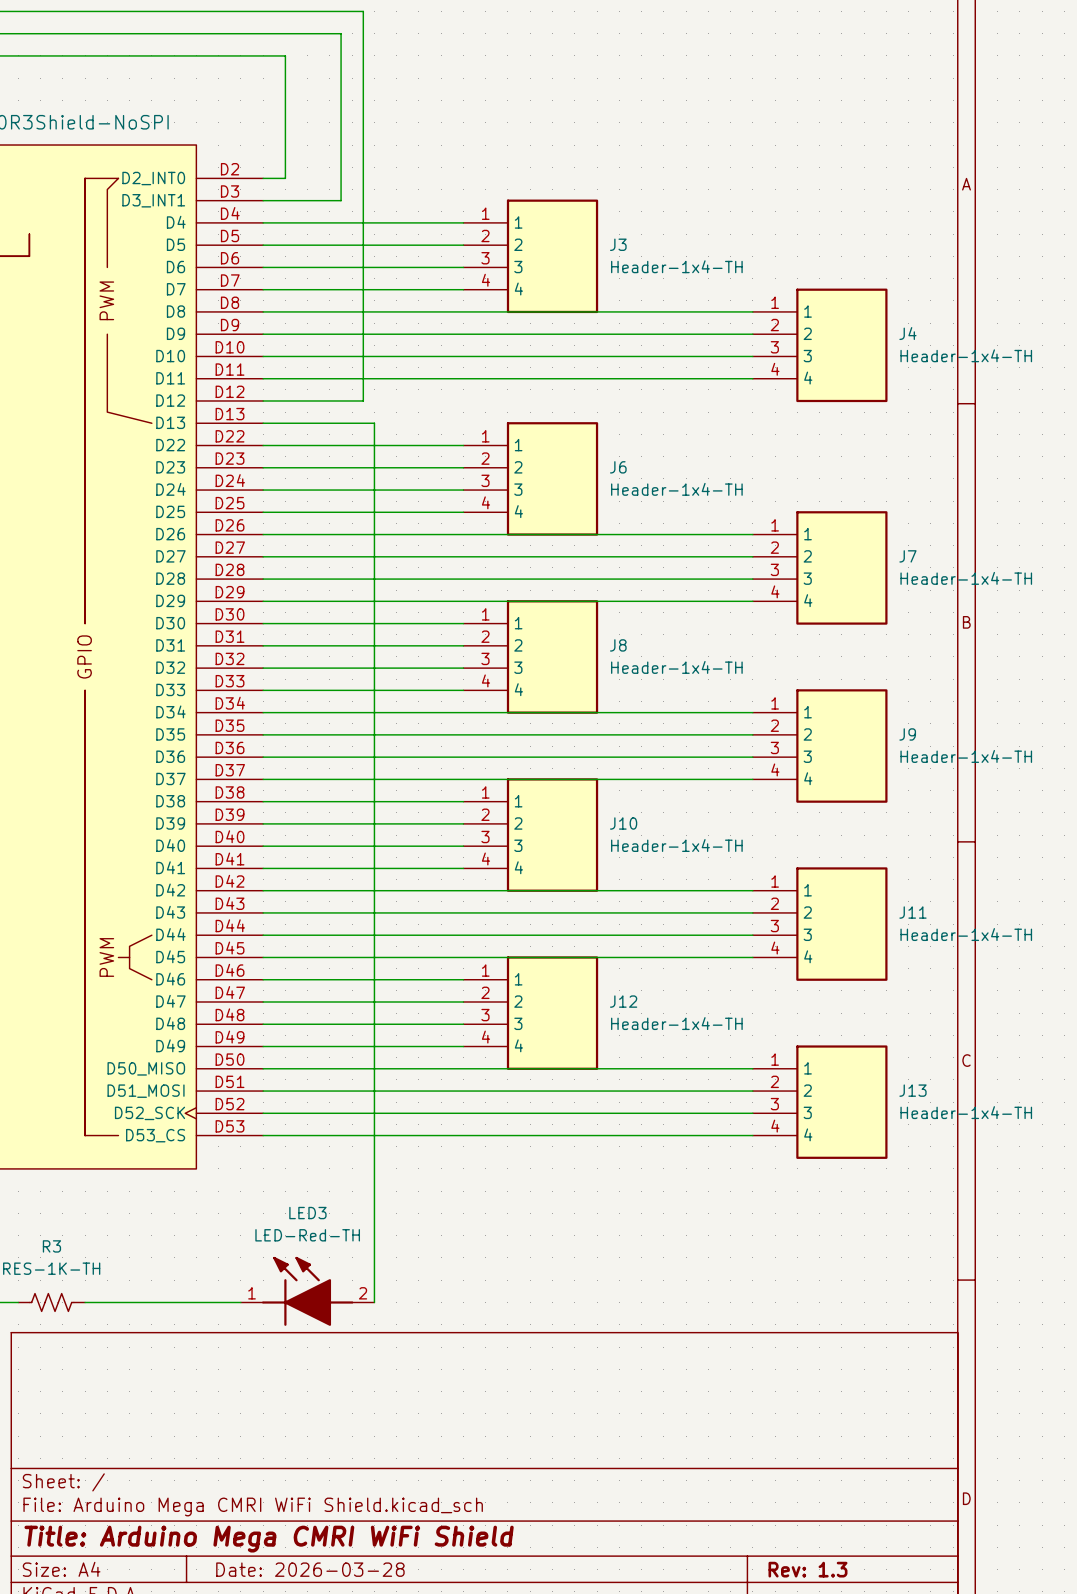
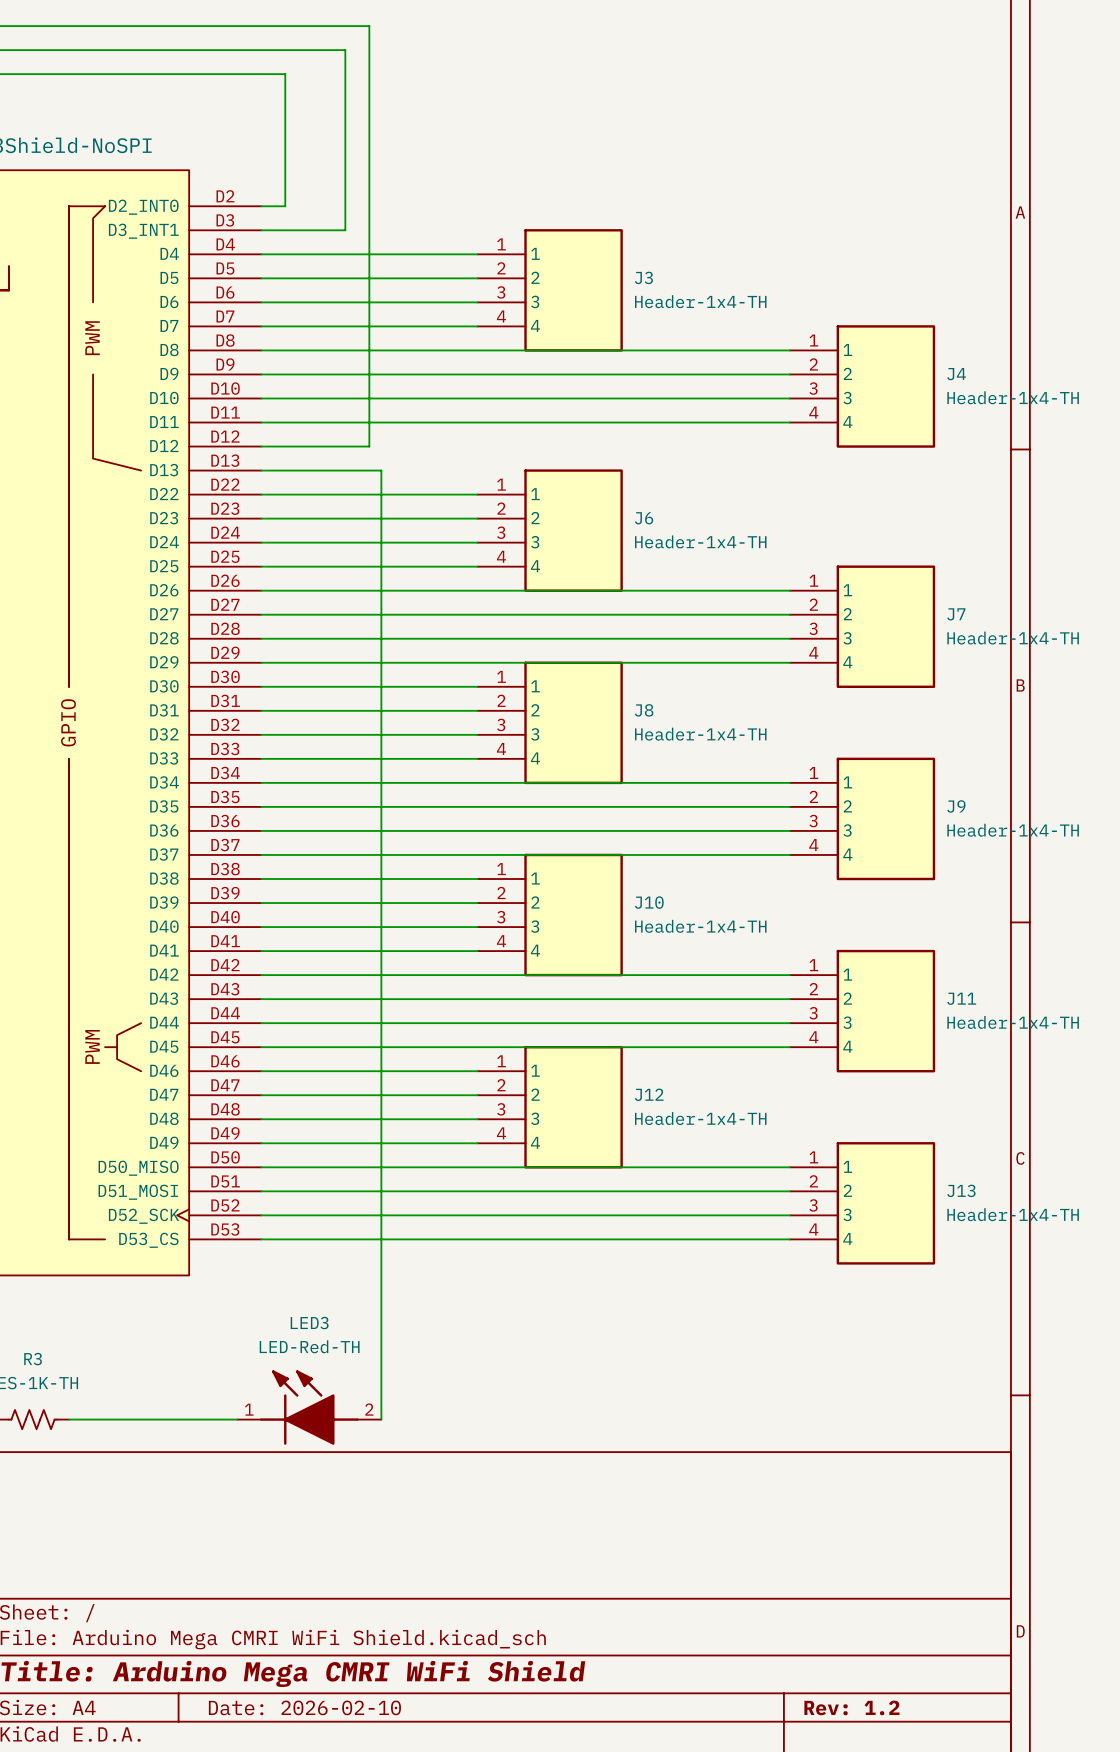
title block: Date: 2026-03-28 (310, 1569) -> Date: 2026-02-10 (304, 1707)
title block: Rev: 1.3 (807, 1569) -> Rev: 1.2 (851, 1707)

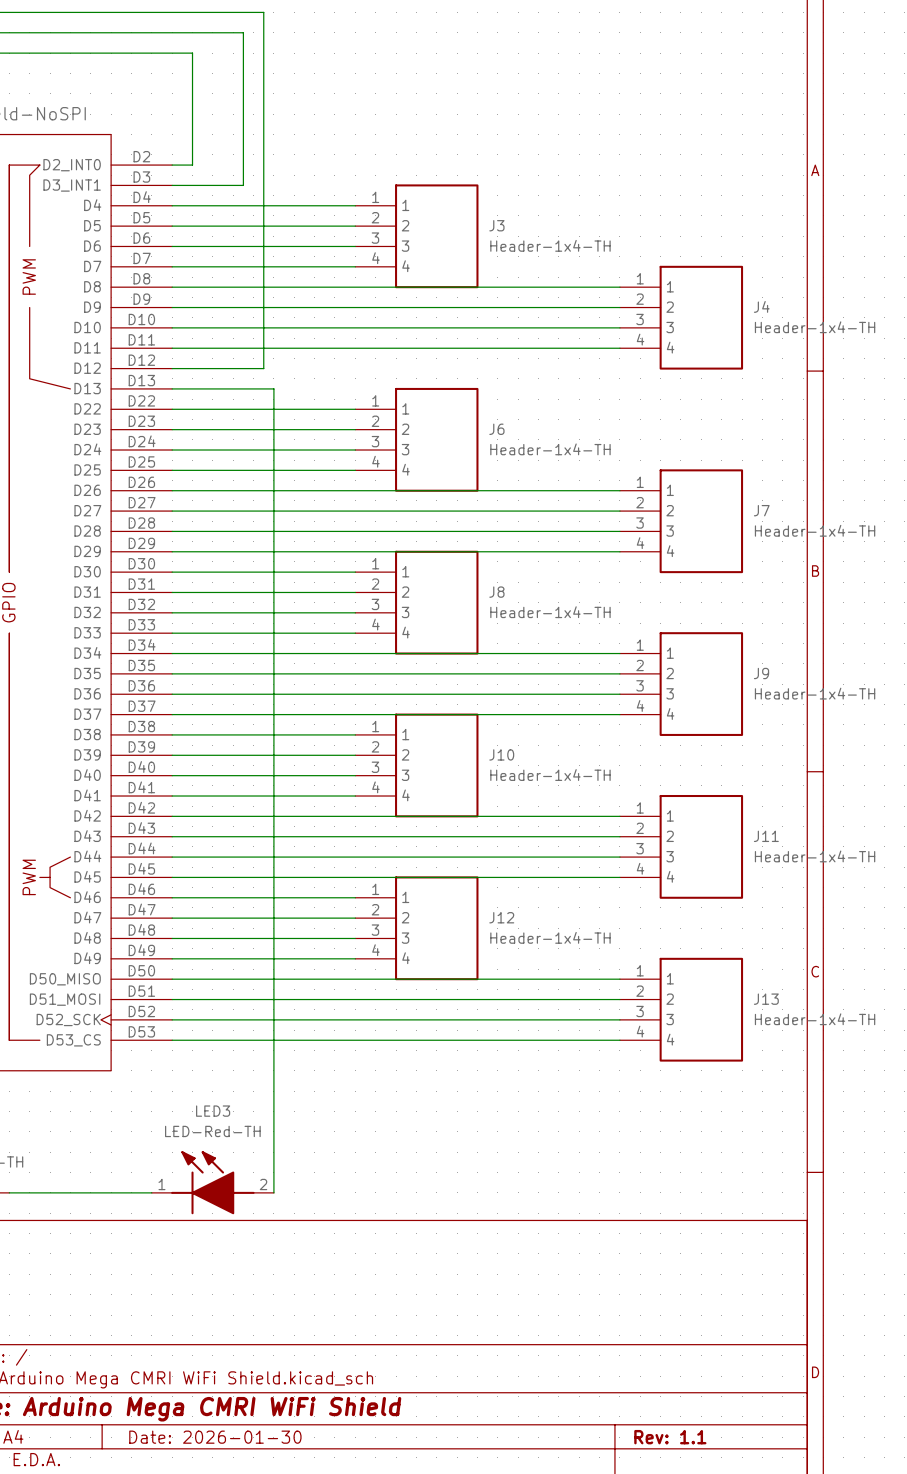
title block: Date: 2026-02-10 (304, 1707) -> Date: 2026-01-30 (215, 1437)
title block: Rev: 1.2 (851, 1707) -> Rev: 1.1 (670, 1437)

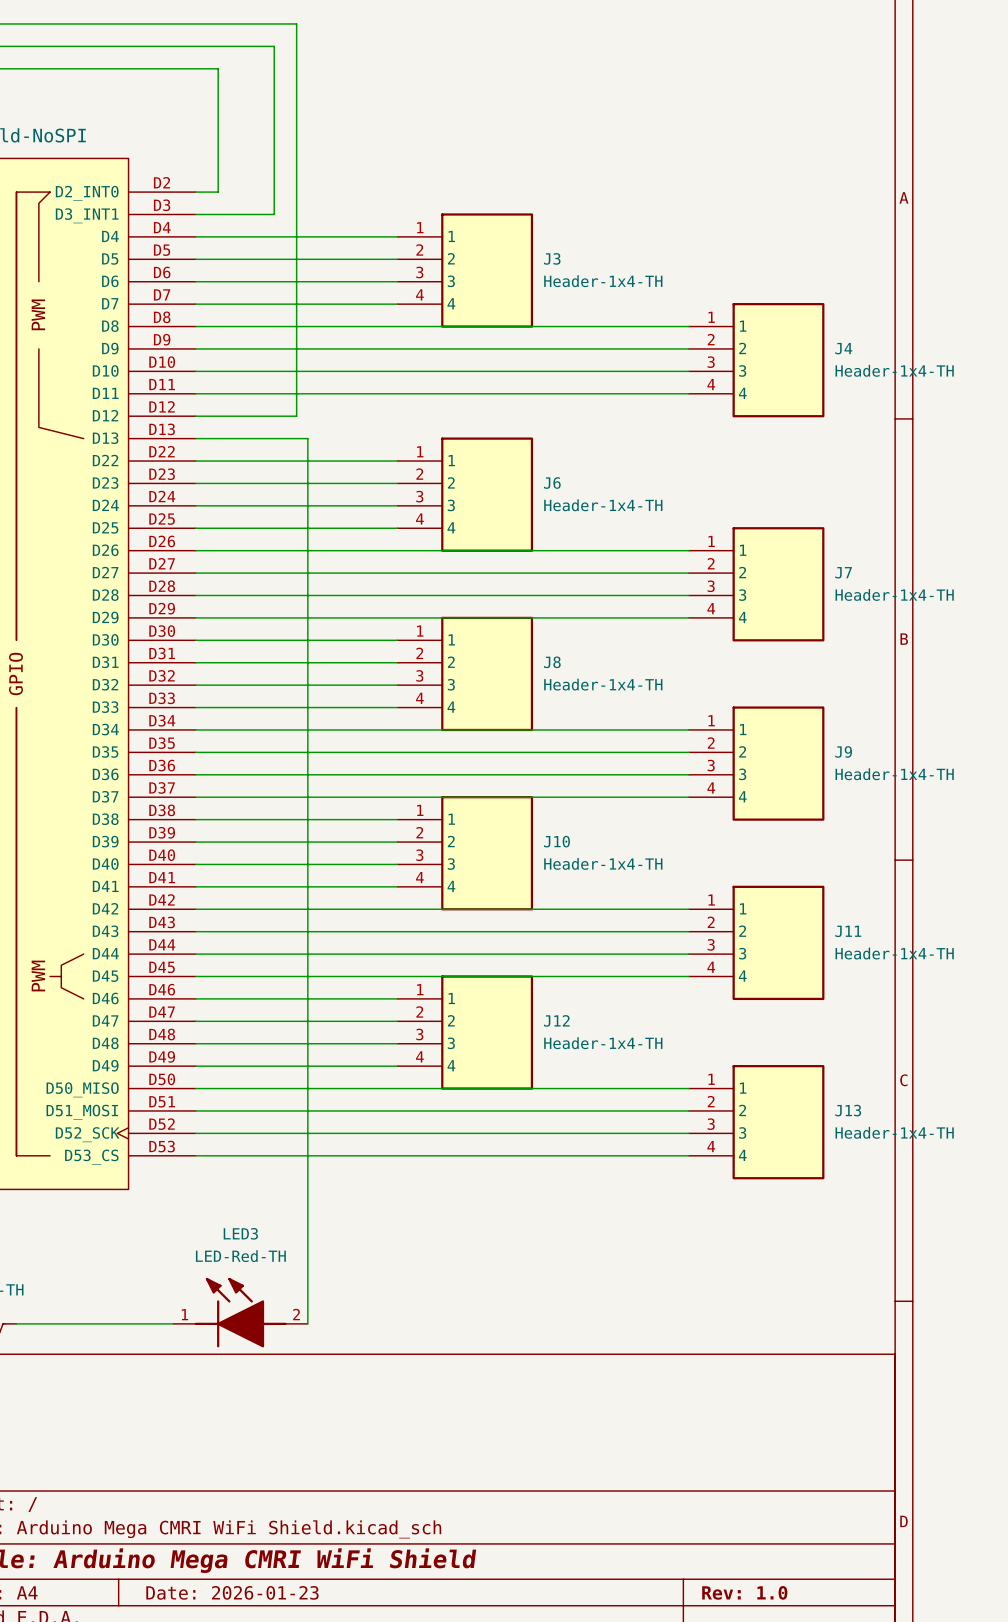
title block: Date: 2026-01-30 (215, 1437) -> Date: 2026-01-23 (232, 1592)
title block: Rev: 1.1 (670, 1437) -> Rev: 1.0 (744, 1592)

